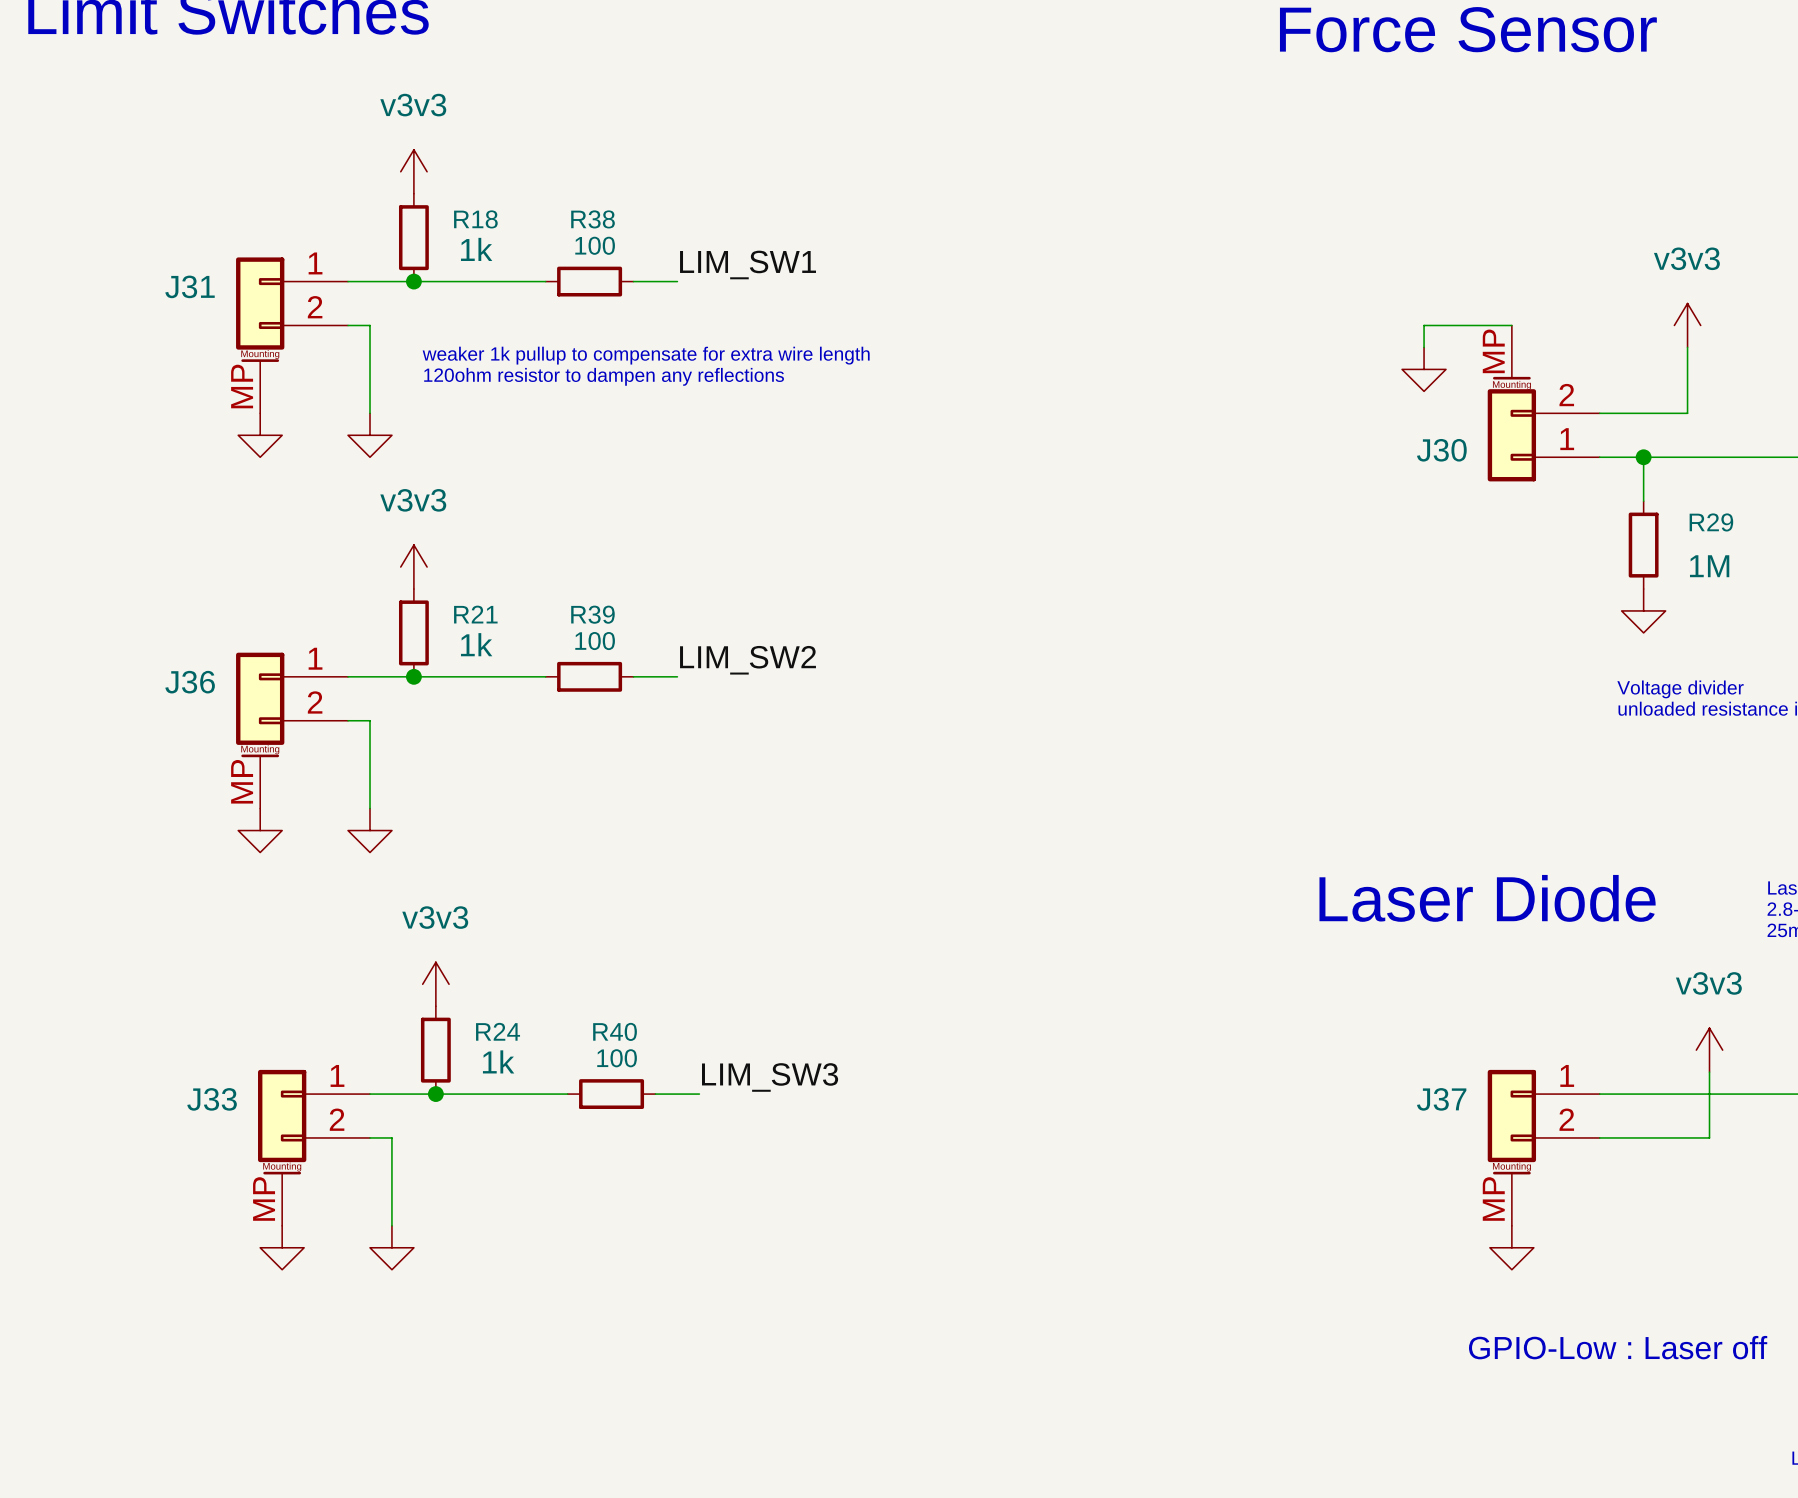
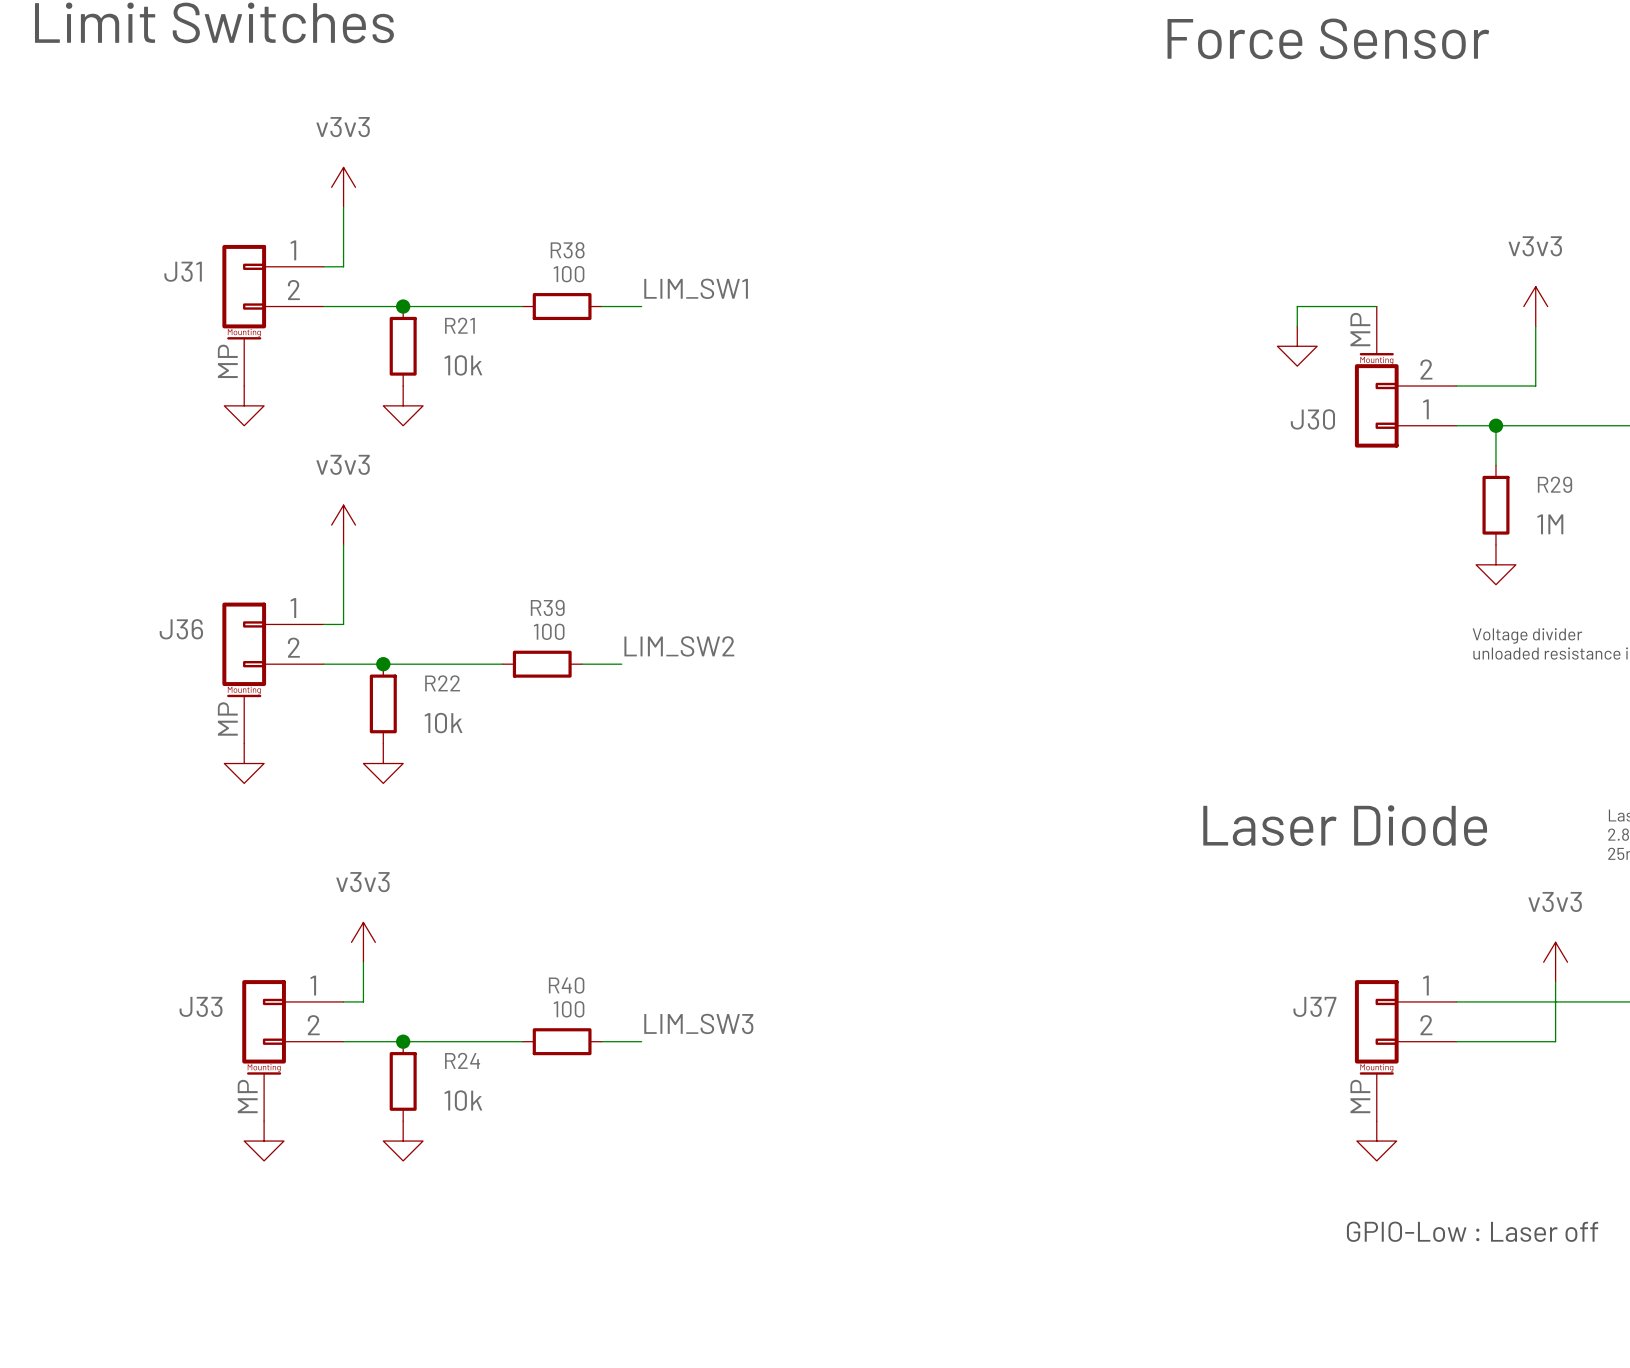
power symbol position: v3v3 (413, 171) -> v3v3 (343, 187)
R18: 1k (413, 237) -> none
label position: LIM_SW1 (748, 264) -> LIM_SW1 (696, 288)
wire: (370, 281) (545, 281) -> (343, 266) (343, 207)
junction position: (413, 281) -> (403, 306)
R38 position: (589, 281) -> (562, 306)
wire: (633, 281) (677, 281) -> (601, 306) (641, 306)
wire: (370, 325) (370, 413) -> (343, 306) (522, 306)
text: weaker 1k pullup to compensate for extra wire length (646, 355) -> none
text: 120ohm resistor to dampen any reflections (604, 376) -> none
power symbol position: (370, 435) -> (403, 405)
power symbol position: v3v3 (413, 567) -> v3v3 (343, 525)
R21 name position: R21 (475, 614) -> R21 (459, 325)
R21 position: (413, 632) -> (403, 346)
R21 value: 1k (476, 644) -> 10k (463, 365)
label position: LIM_SW2 (748, 660) -> LIM_SW2 (679, 646)
wire: (370, 676) (545, 676) -> (343, 624) (343, 544)
junction position: (413, 676) -> (383, 664)
R39 position: (589, 676) -> (542, 664)
wire: (633, 676) (677, 676) -> (582, 664) (621, 664)
wire: (370, 720) (370, 808) -> (343, 664) (502, 664)
R22: none -> 10k (383, 703)
power symbol position: (370, 830) -> (383, 763)
power symbol position: v3v3 (435, 984) -> v3v3 (363, 942)
R24 name position: R24 (498, 1031) -> R24 (462, 1060)
R24 position: (435, 1050) -> (403, 1081)
R24 value: 1k (498, 1061) -> 10k (463, 1100)
label position: LIM_SW3 (770, 1077) -> LIM_SW3 (698, 1023)
wire: (391, 1094) (567, 1094) -> (363, 1001) (363, 962)
junction position: (435, 1094) -> (403, 1041)
R40 position: (611, 1094) -> (562, 1041)
wire: (655, 1094) (699, 1094) -> (601, 1041) (641, 1041)
wire: (391, 1137) (391, 1225) -> (363, 1041) (522, 1041)
power symbol position: (391, 1247) -> (403, 1141)

